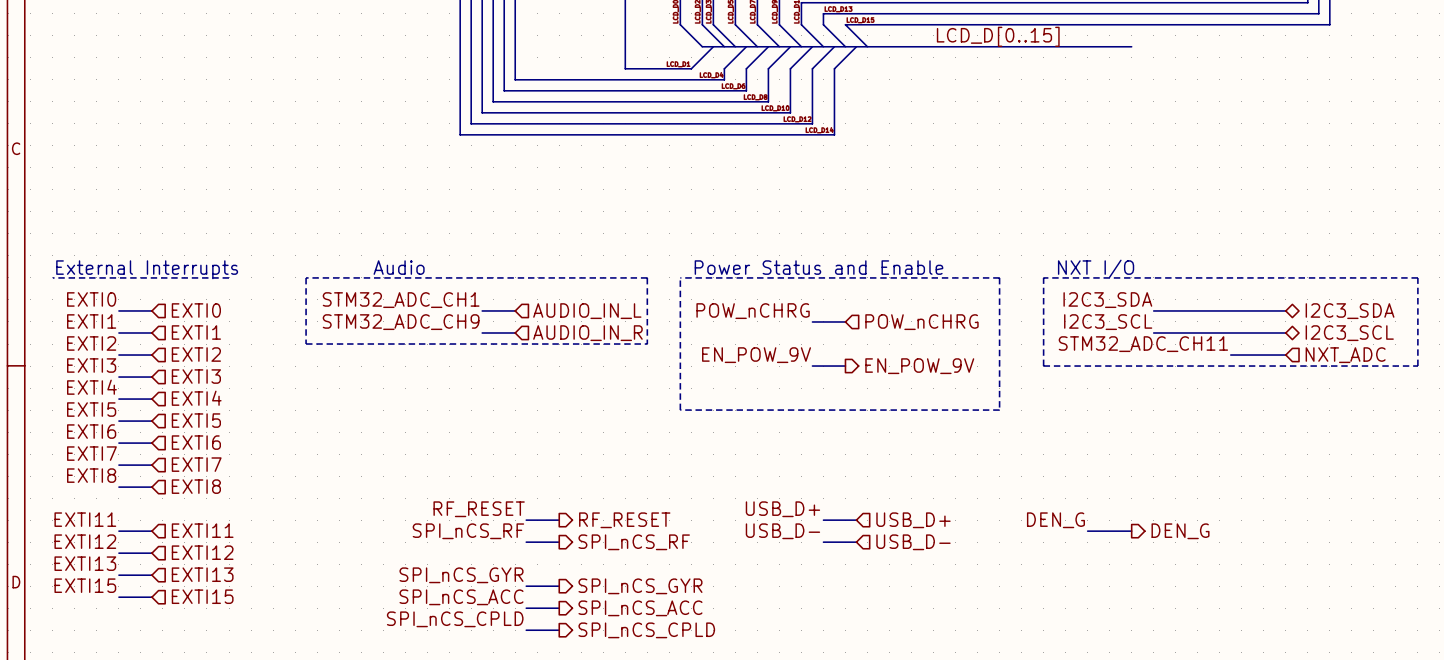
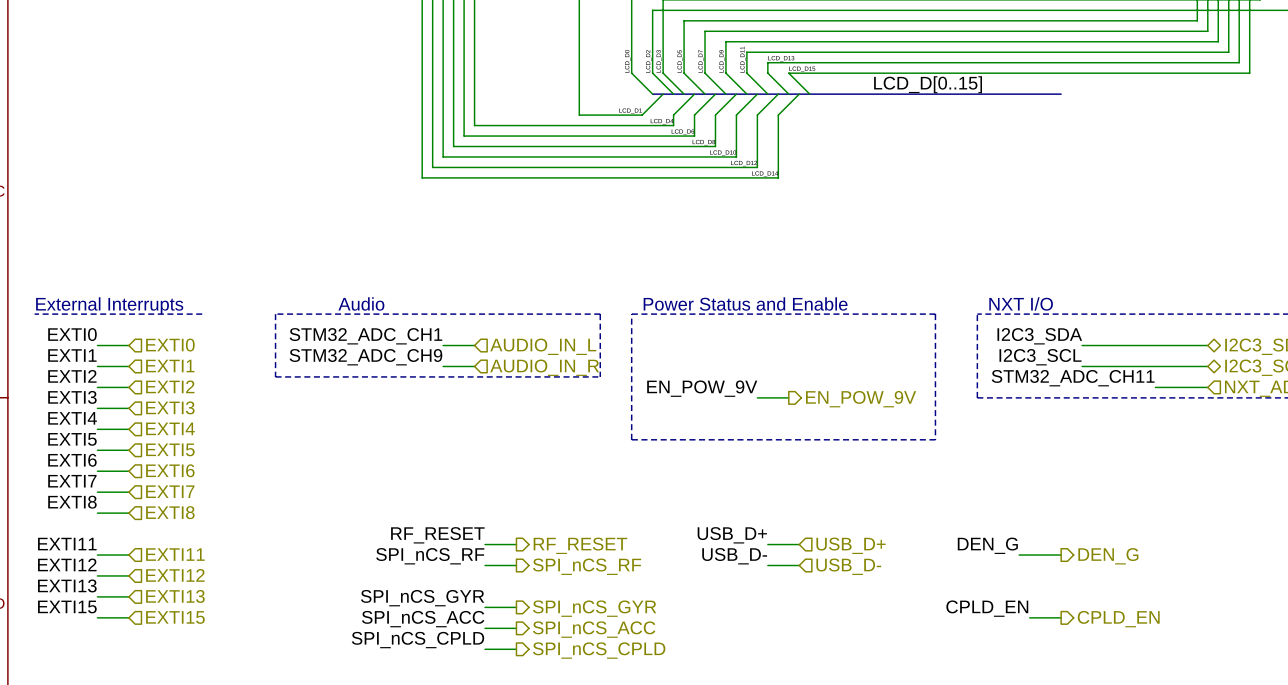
label: POW_nCHRG (753, 311) -> none
wire: (812, 321) (845, 321) -> none
hierarchical label: POW_nCHRG (921, 322) -> none
label: none -> CPLD_EN (987, 608)
wire: none -> (1029, 617) (1061, 617)
hierarchical label: none -> CPLD_EN (1118, 619)

